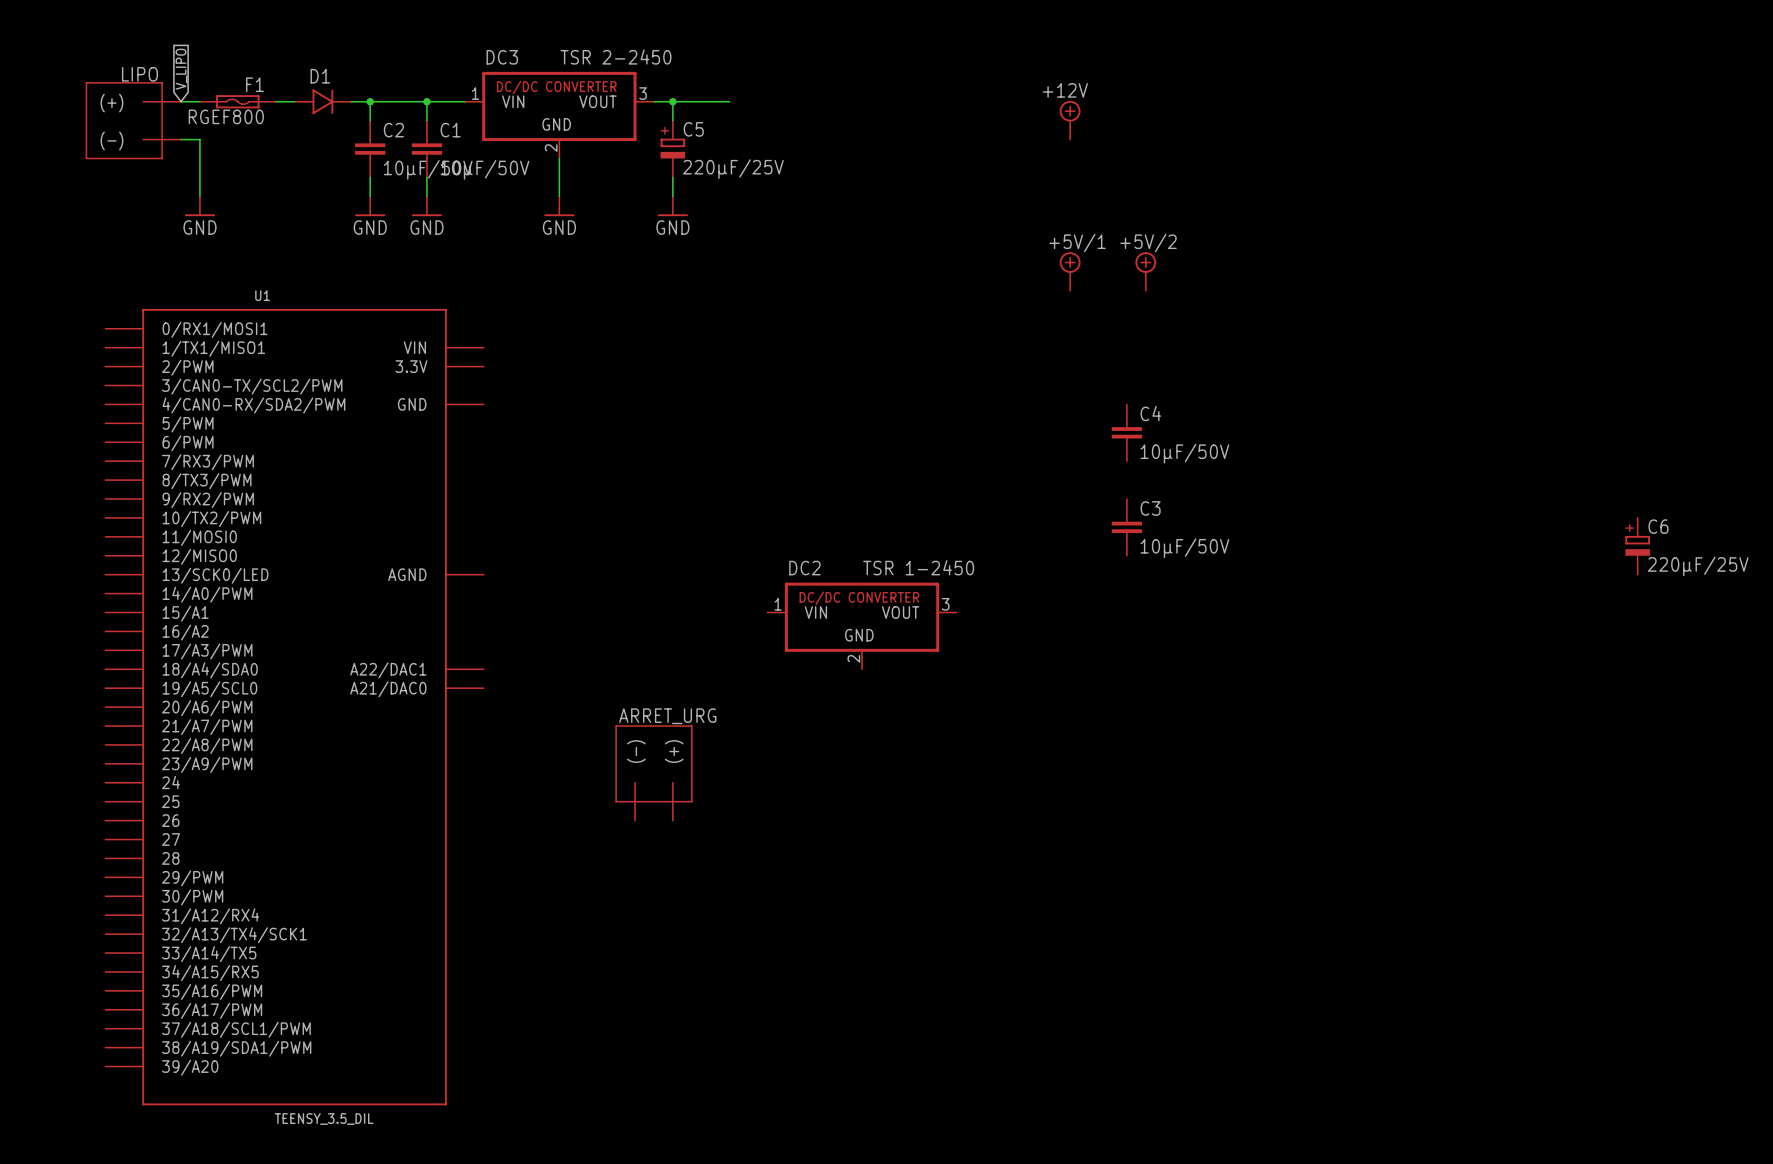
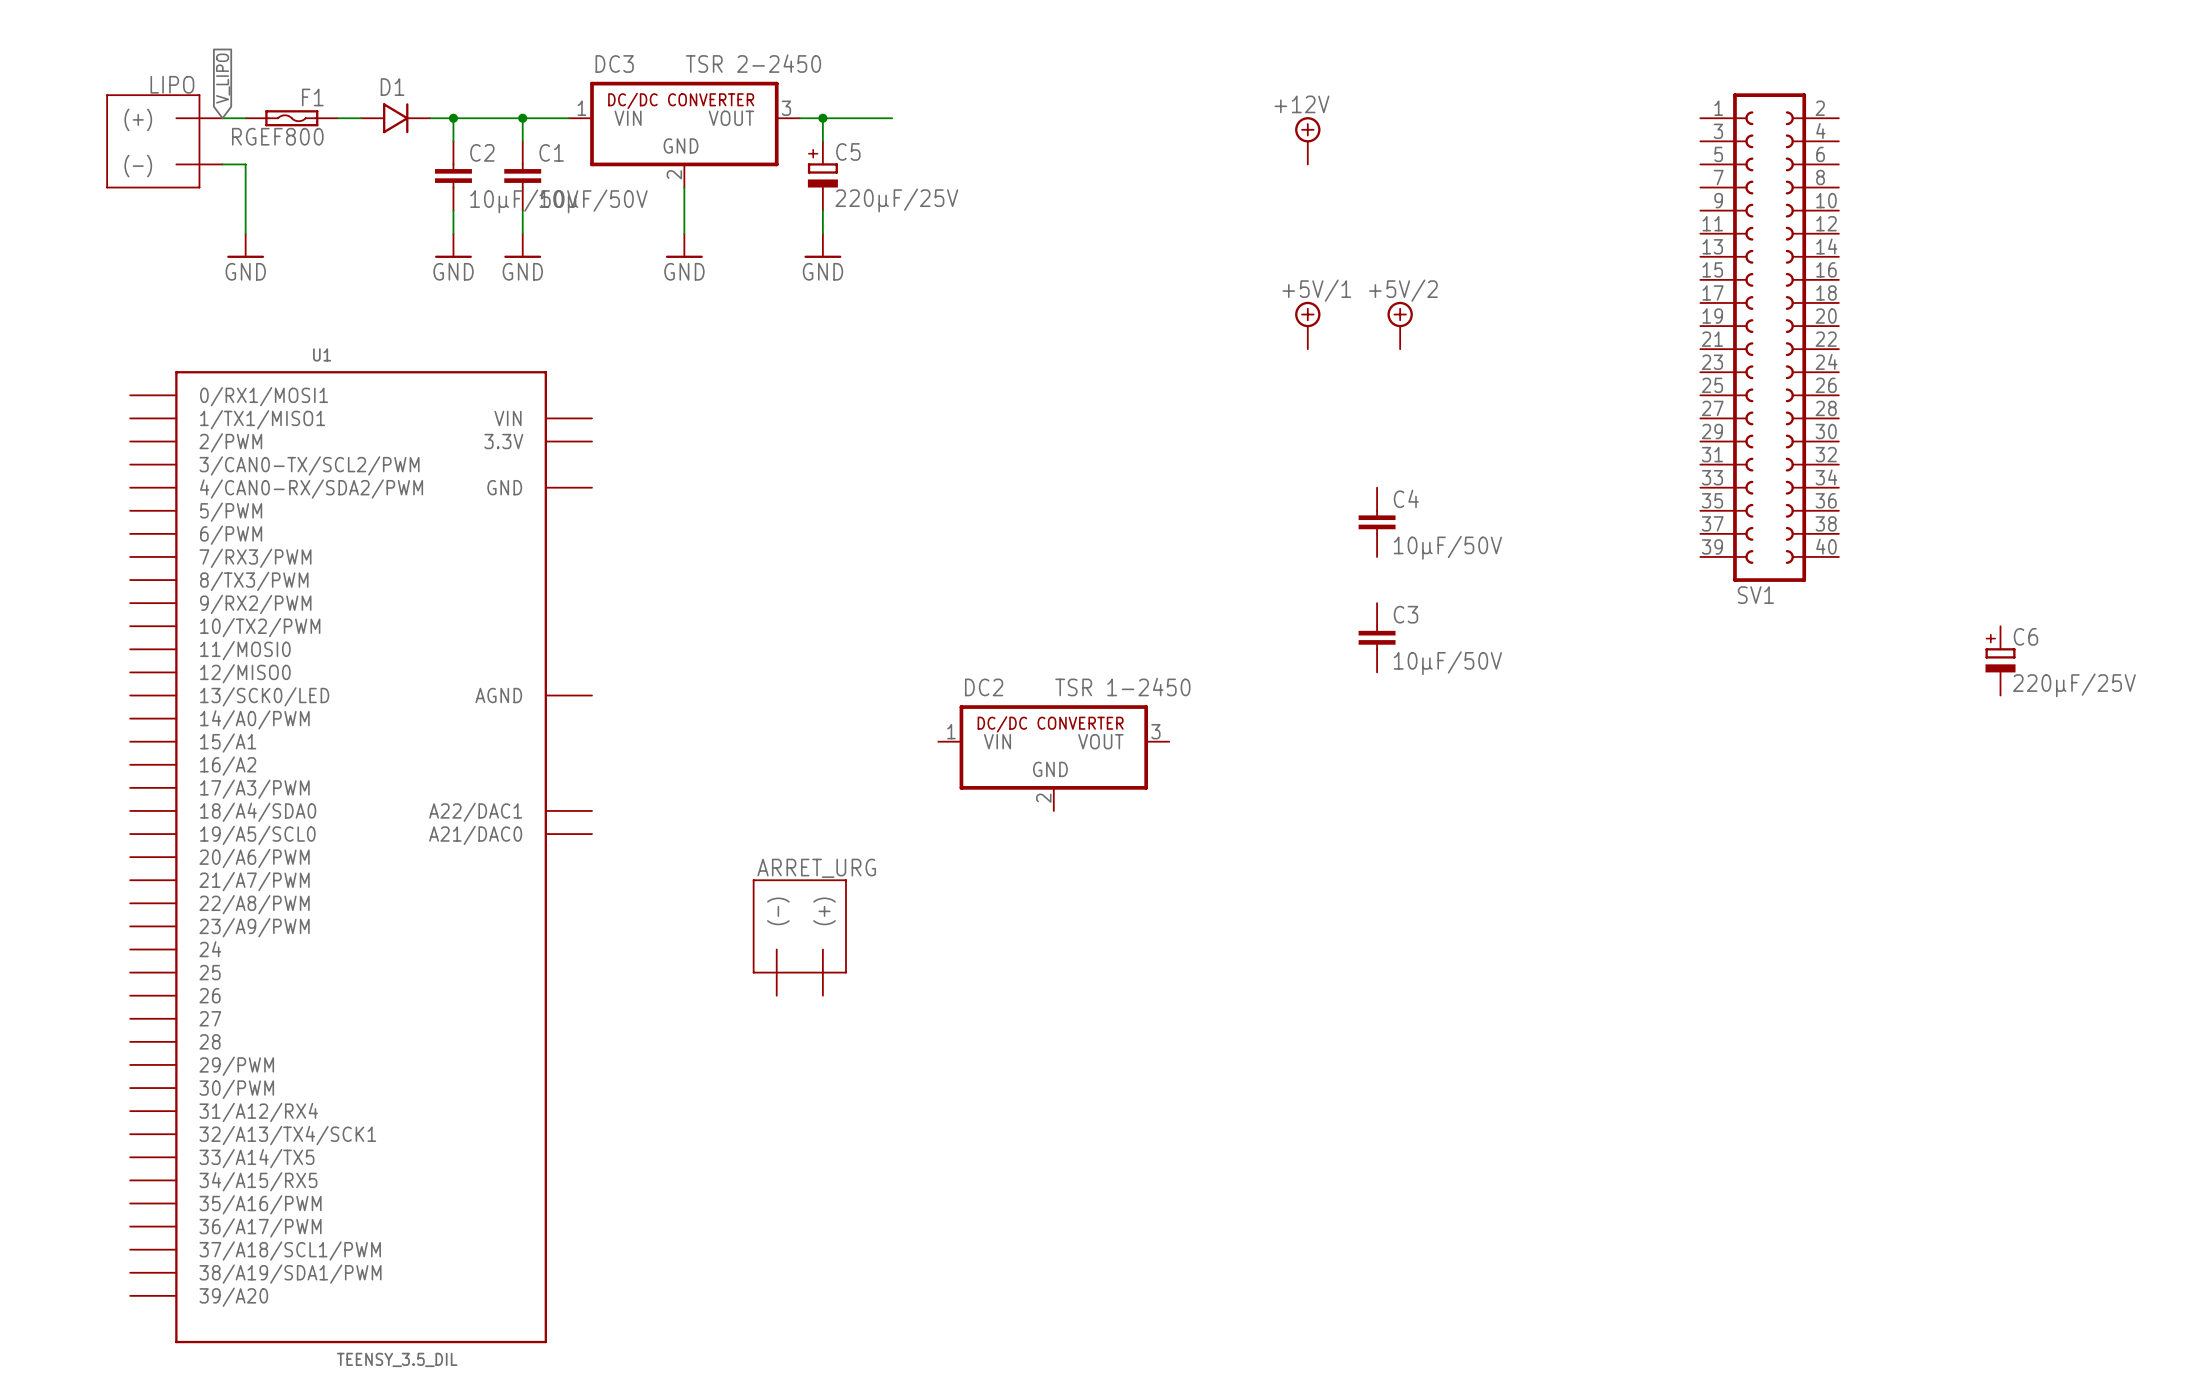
SV1: none -> (1769, 337)

